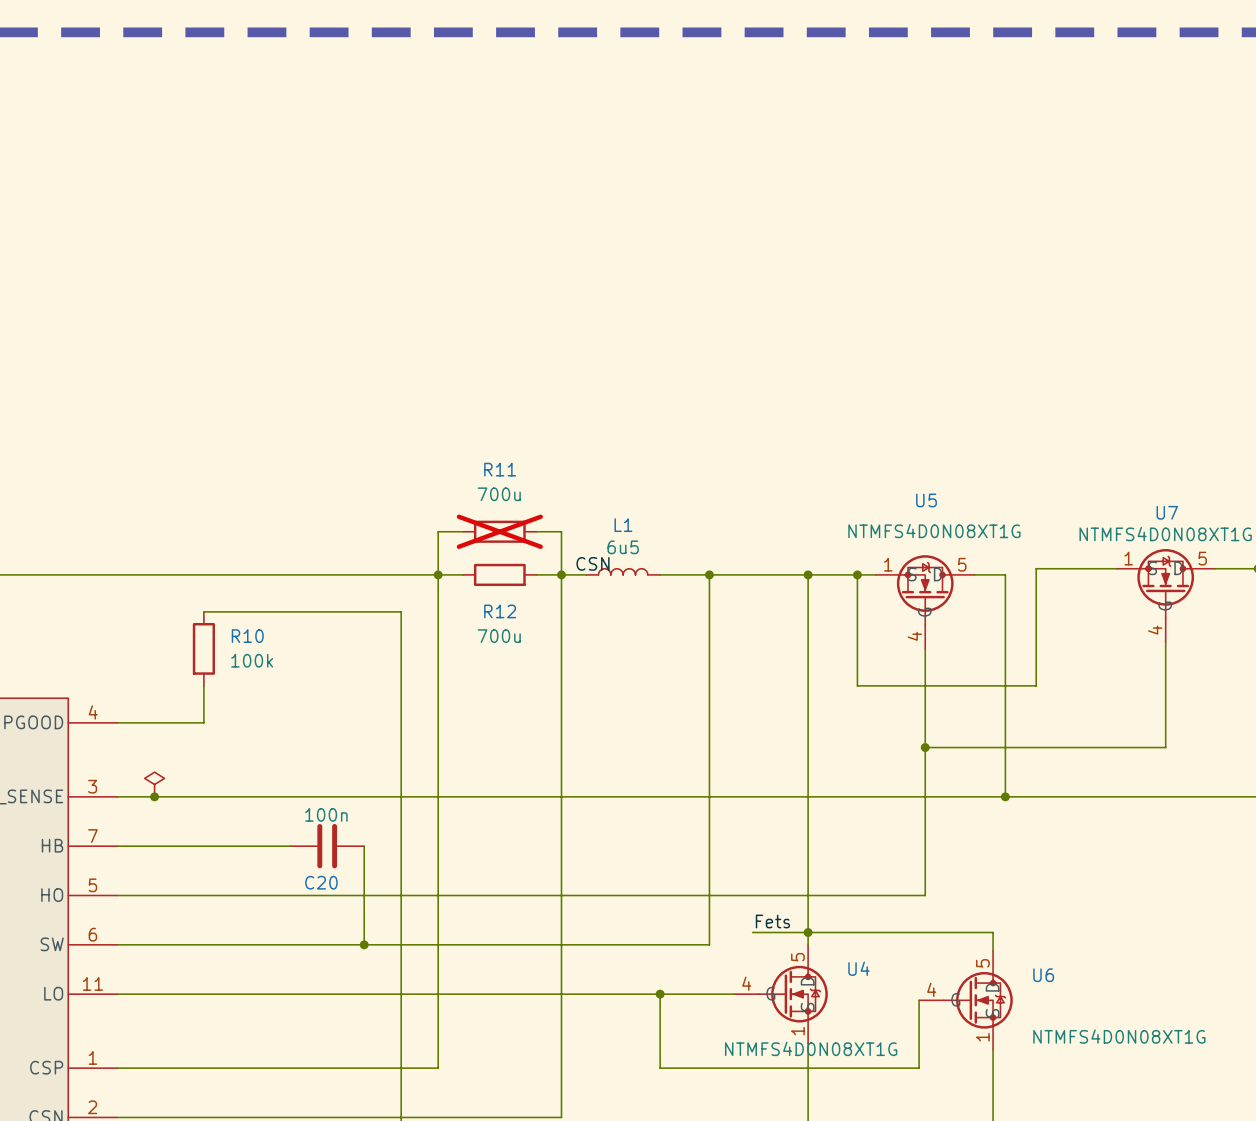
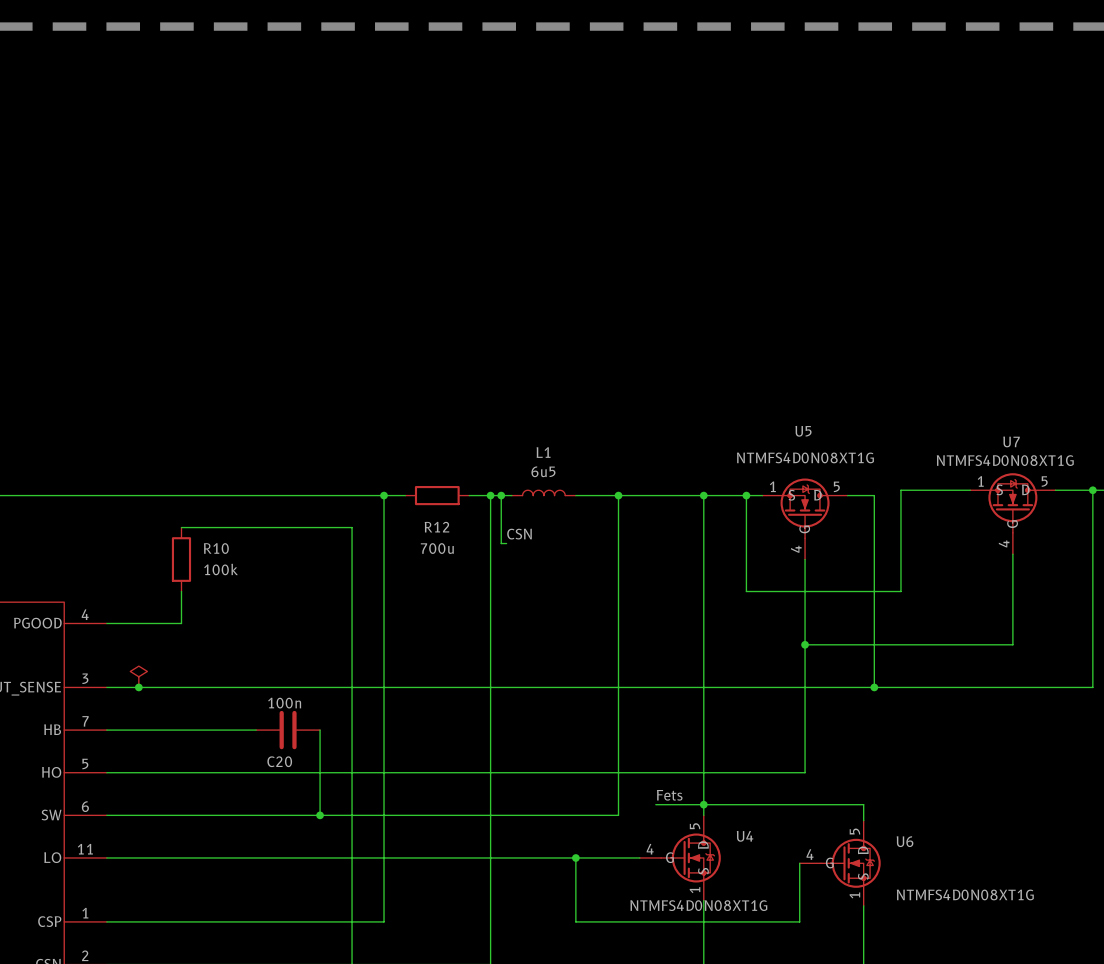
wire: (462, 531) (438, 531) (438, 574) -> none
R11: 700u (499, 531) -> none
wire: (536, 531) (561, 531) (561, 574) -> none
label position: CSN (592, 563) -> CSN (519, 534)
wire: none -> (501, 495) (501, 543) (506, 543)
junction: none -> (501, 495)

